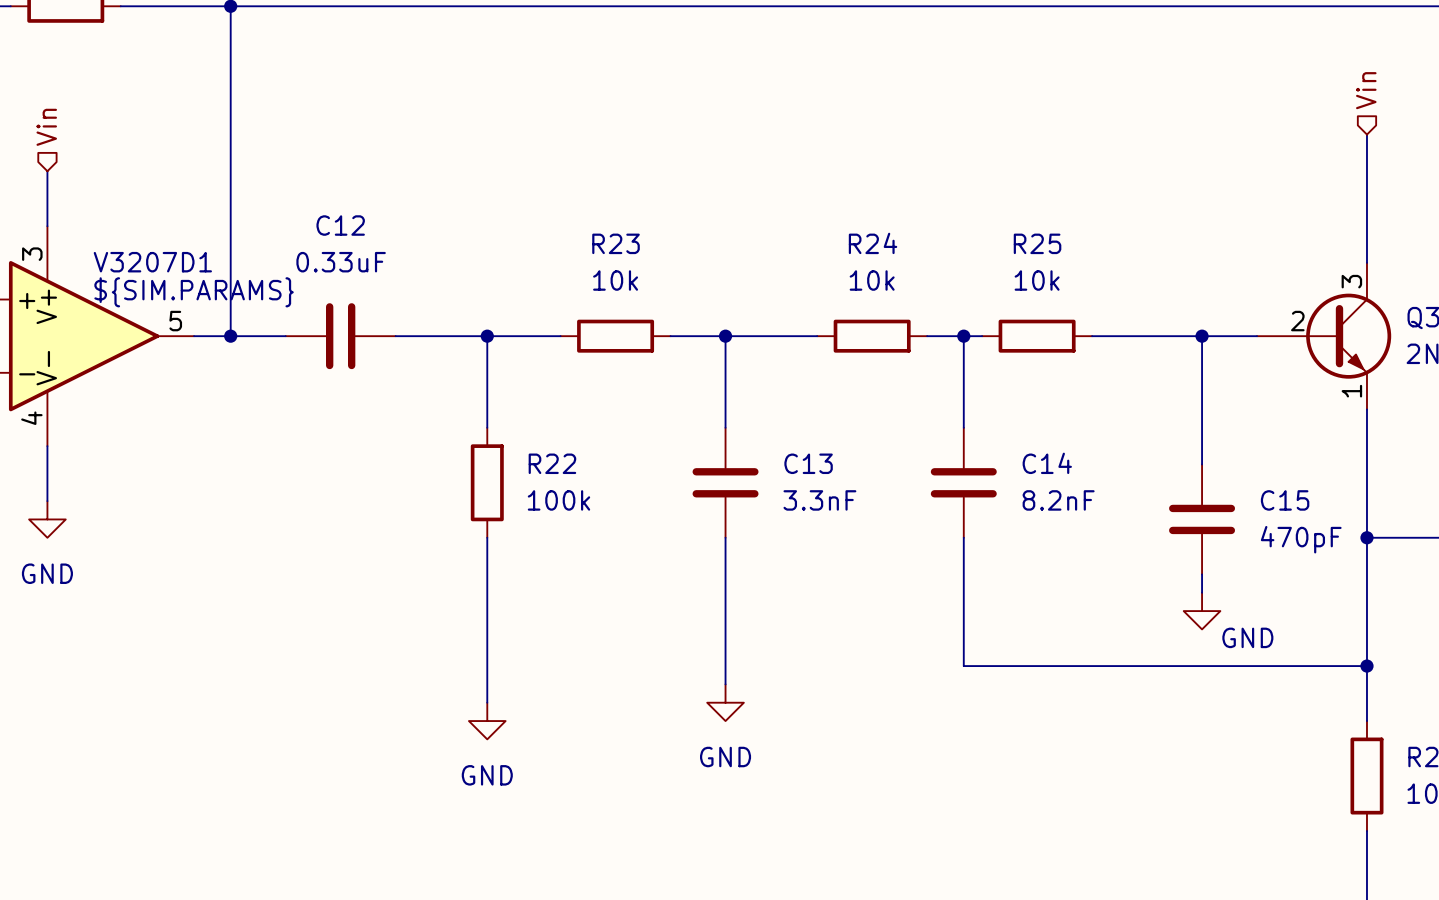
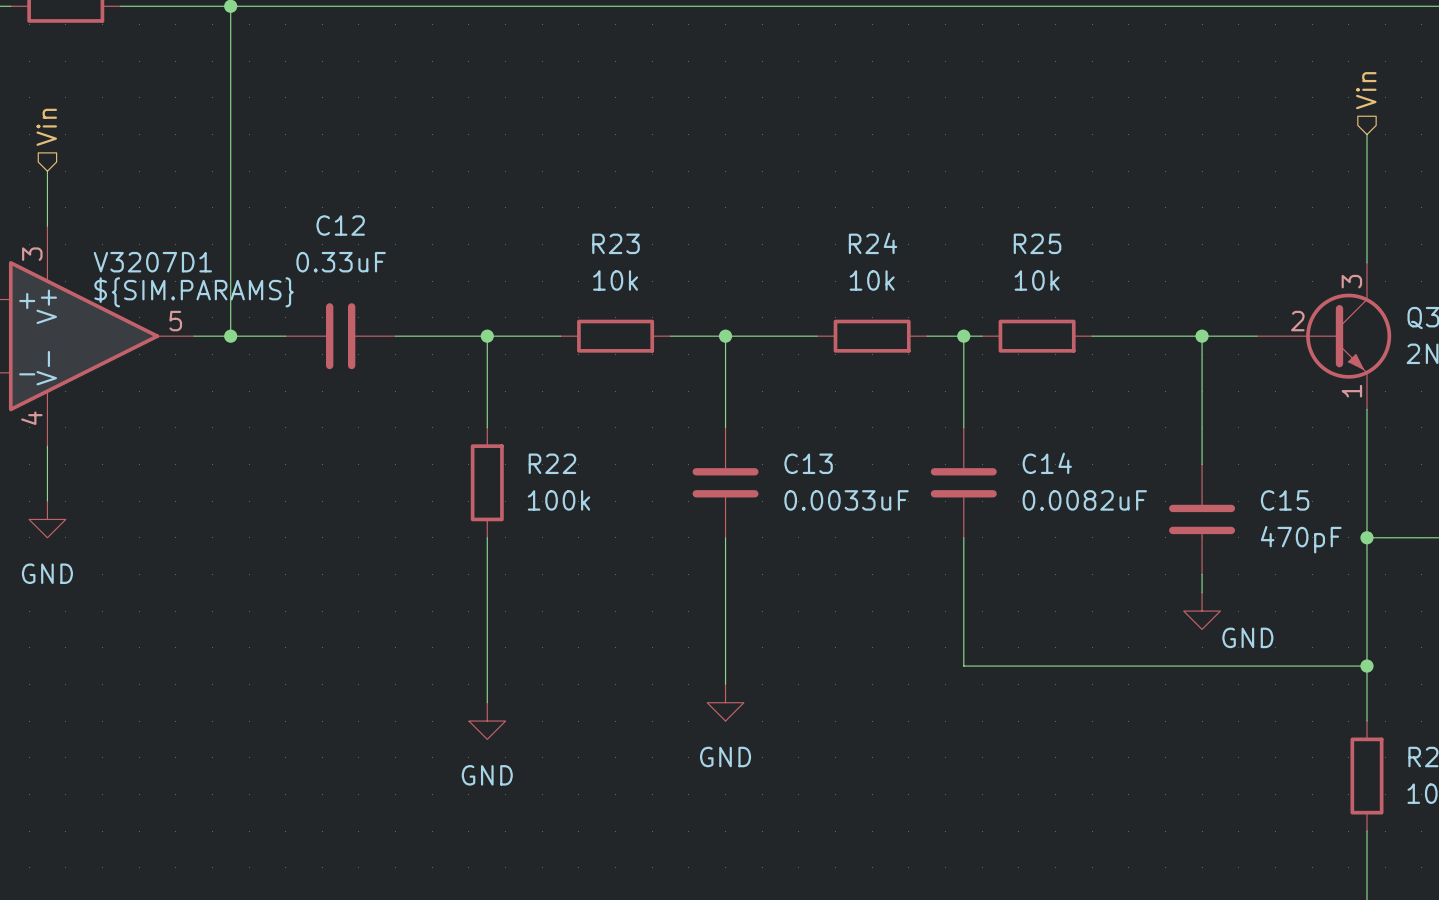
C13 value: 3.3nF (819, 500) -> 0.0033uF (846, 500)
C14 value: 8.2nF (1058, 500) -> 0.0082uF (1084, 500)

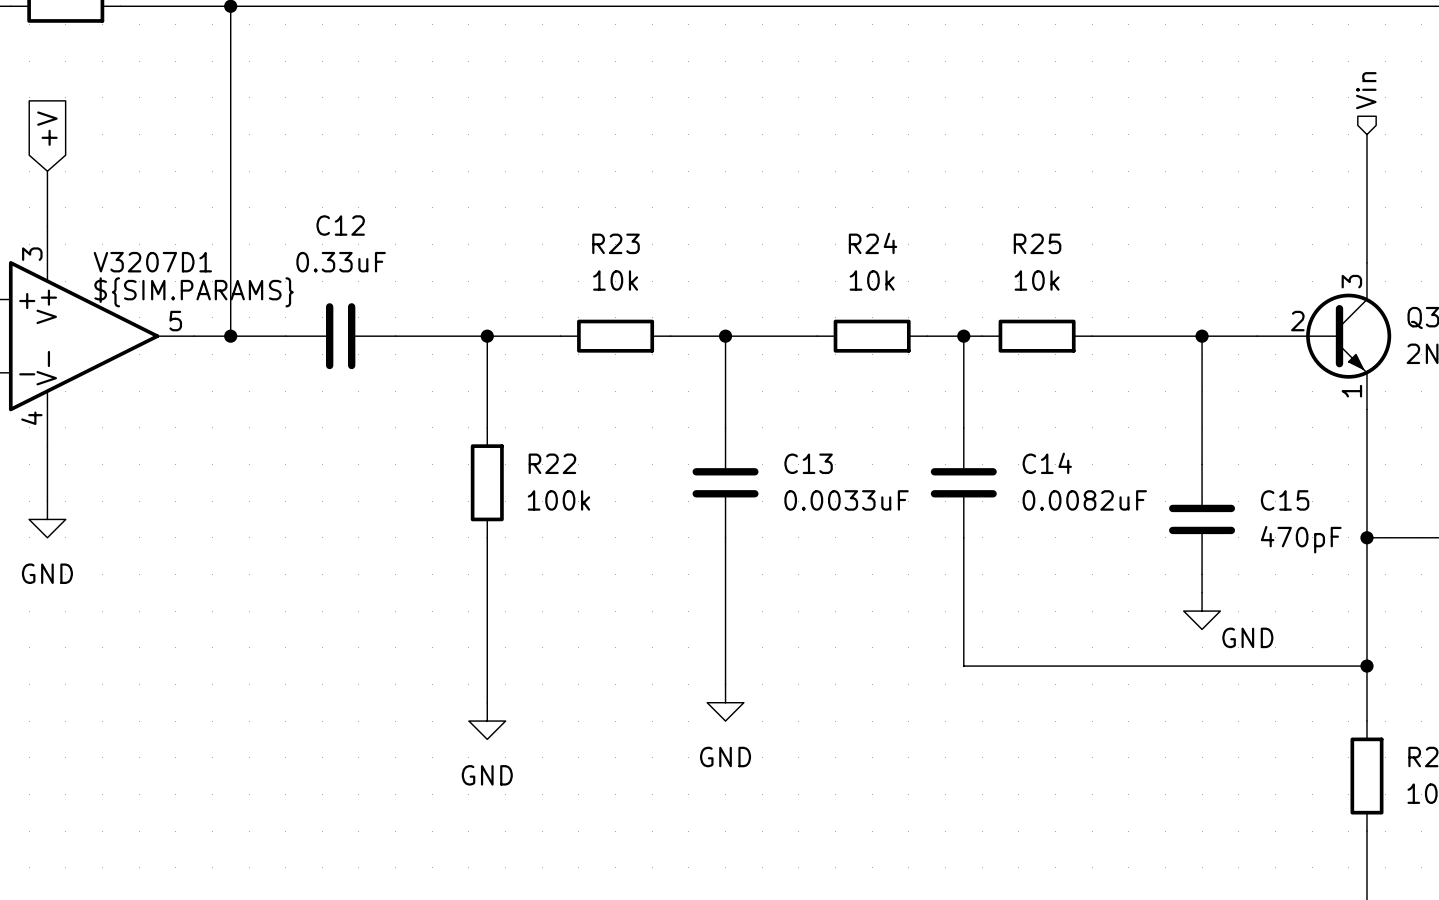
hierarchical label: Vin (46, 127) -> none
global label: none -> +V (47, 128)

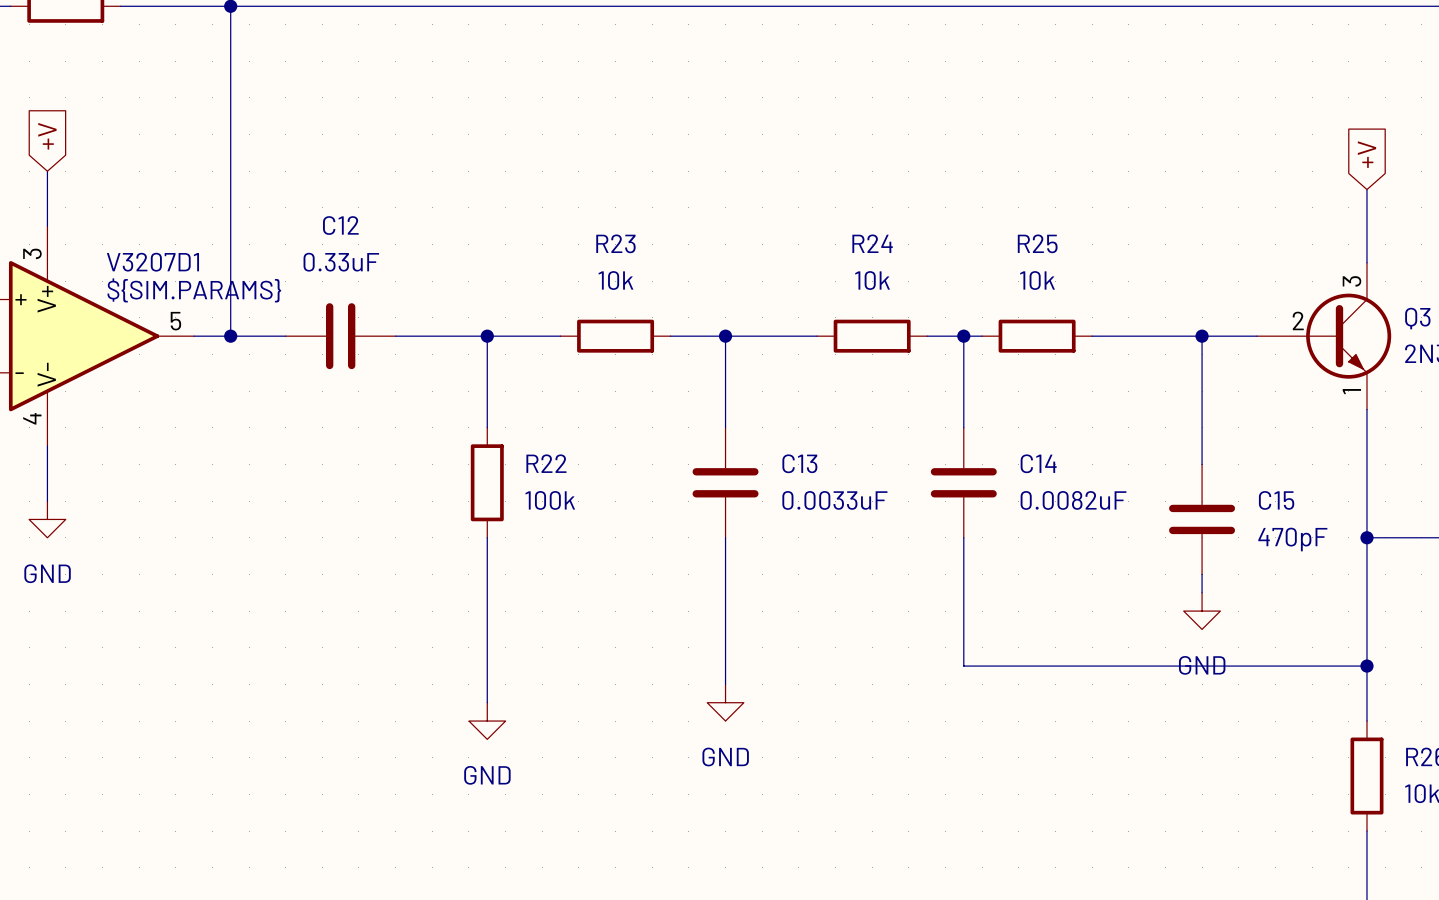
hierarchical label: Vin (1366, 90) -> none
wire: (1366, 134) (1366, 189) -> none
global label: none -> +V (1366, 154)
power symbol text position: GND (1247, 637) -> GND (1202, 665)

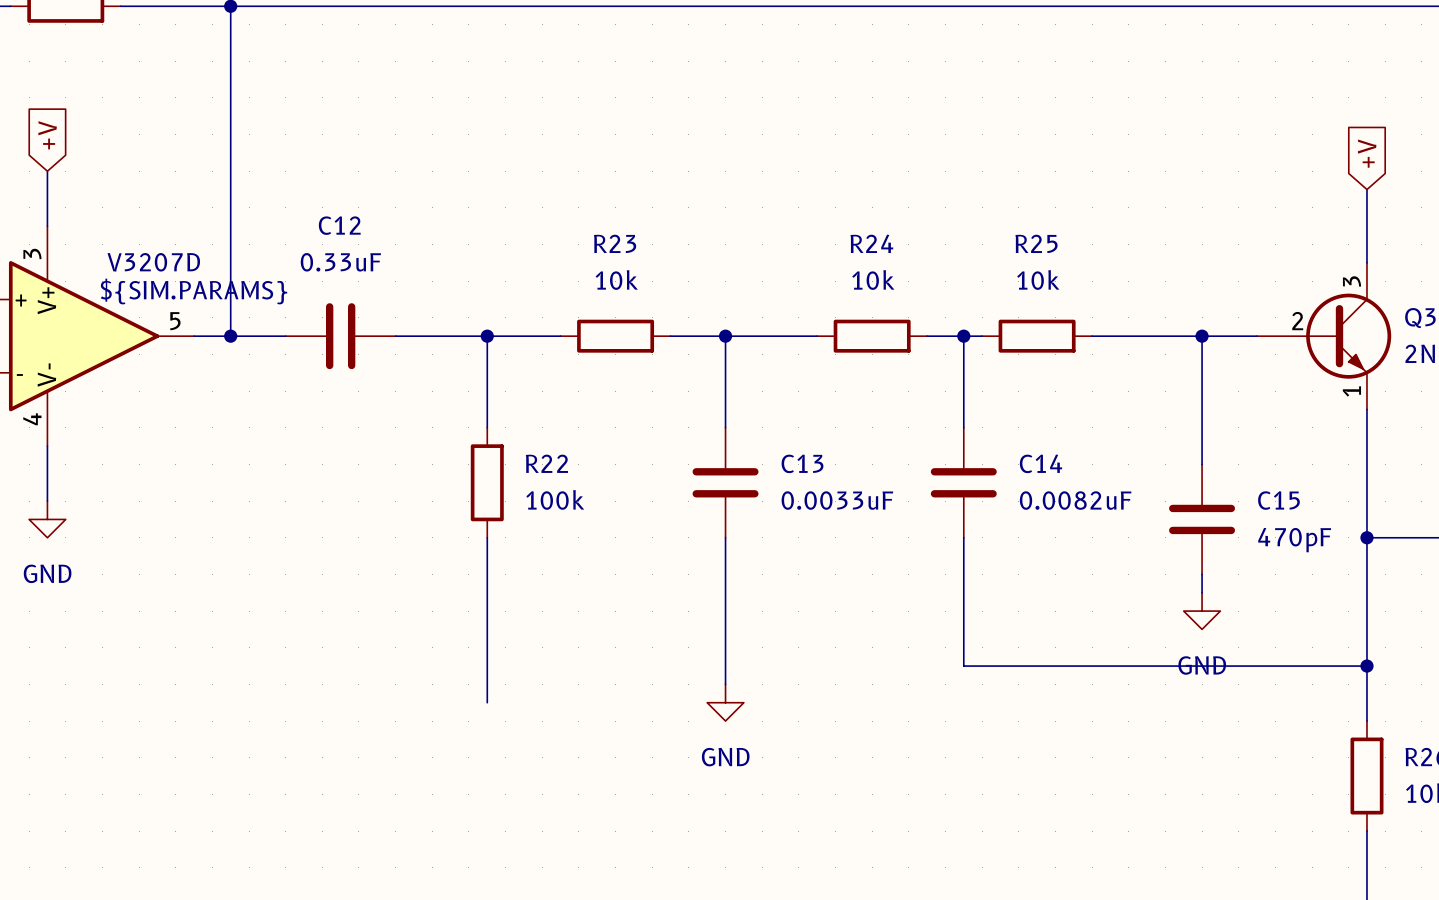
V3207D1 name: V3207D1 (152, 262) -> V3207D (153, 262)
power symbol: GND (487, 721) -> none

